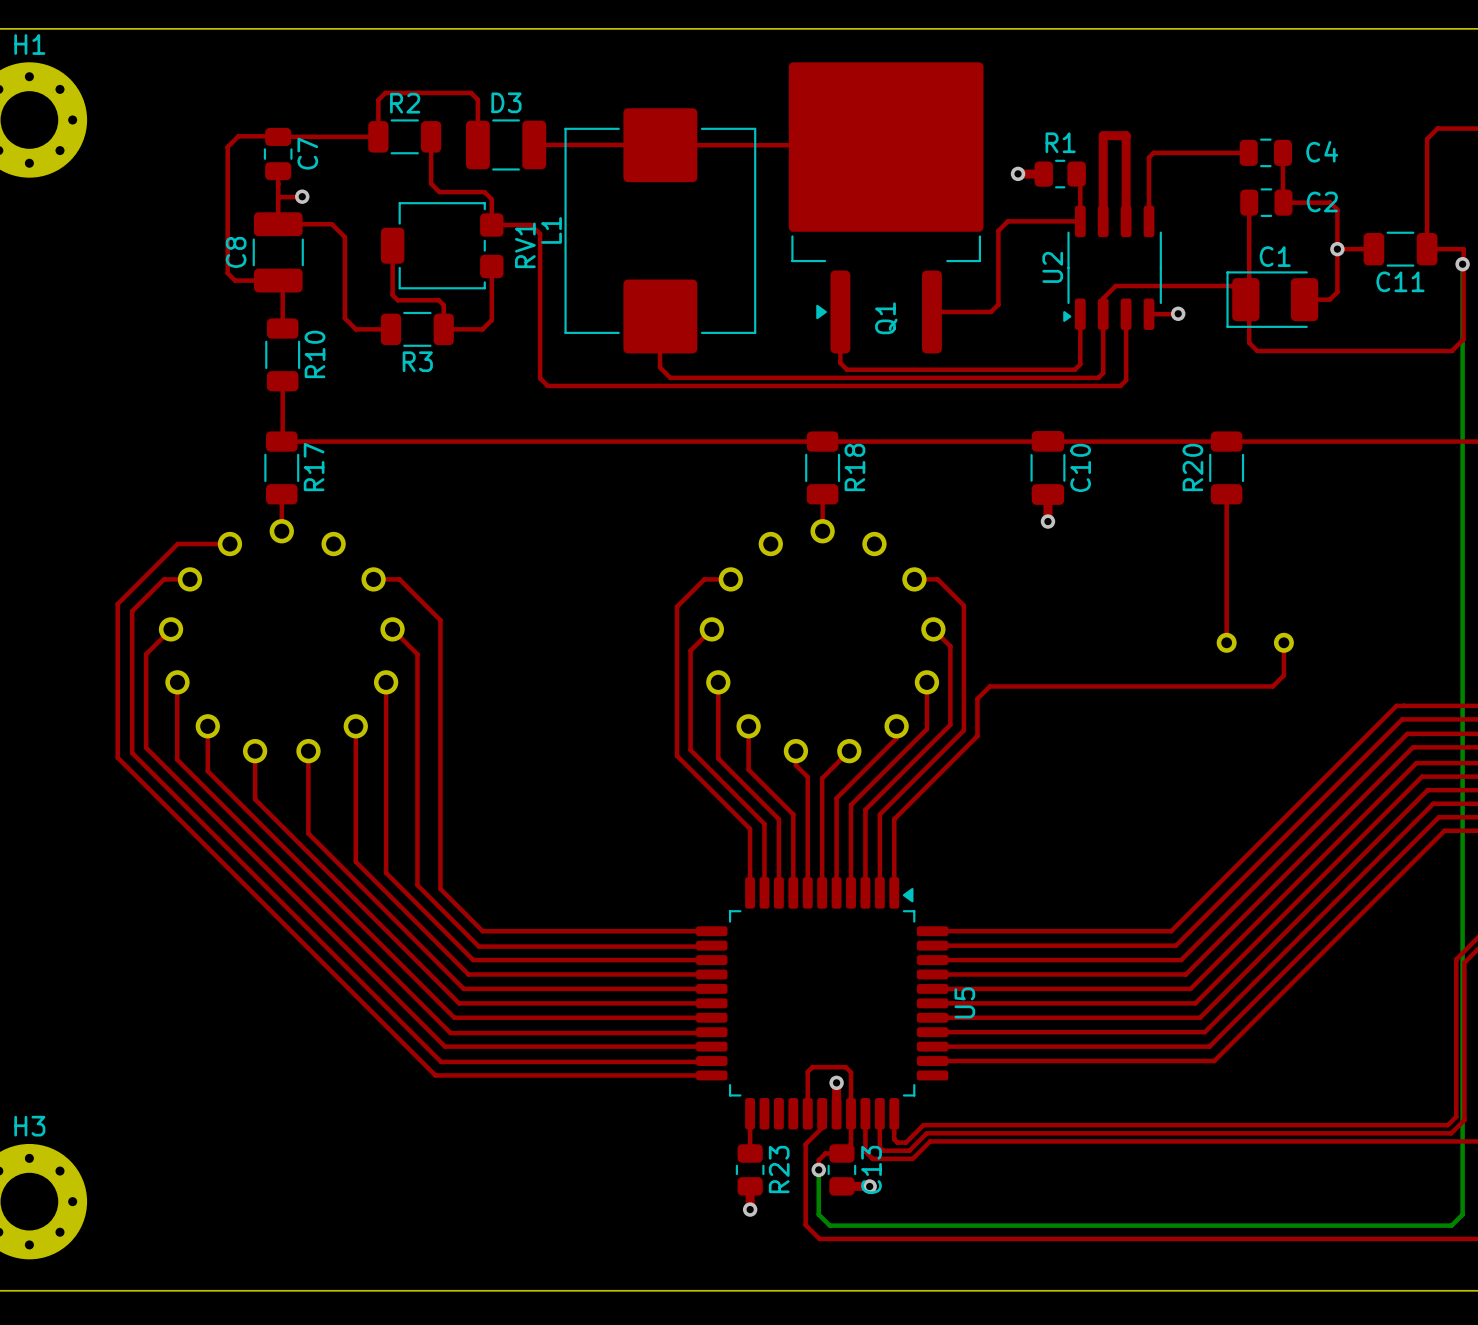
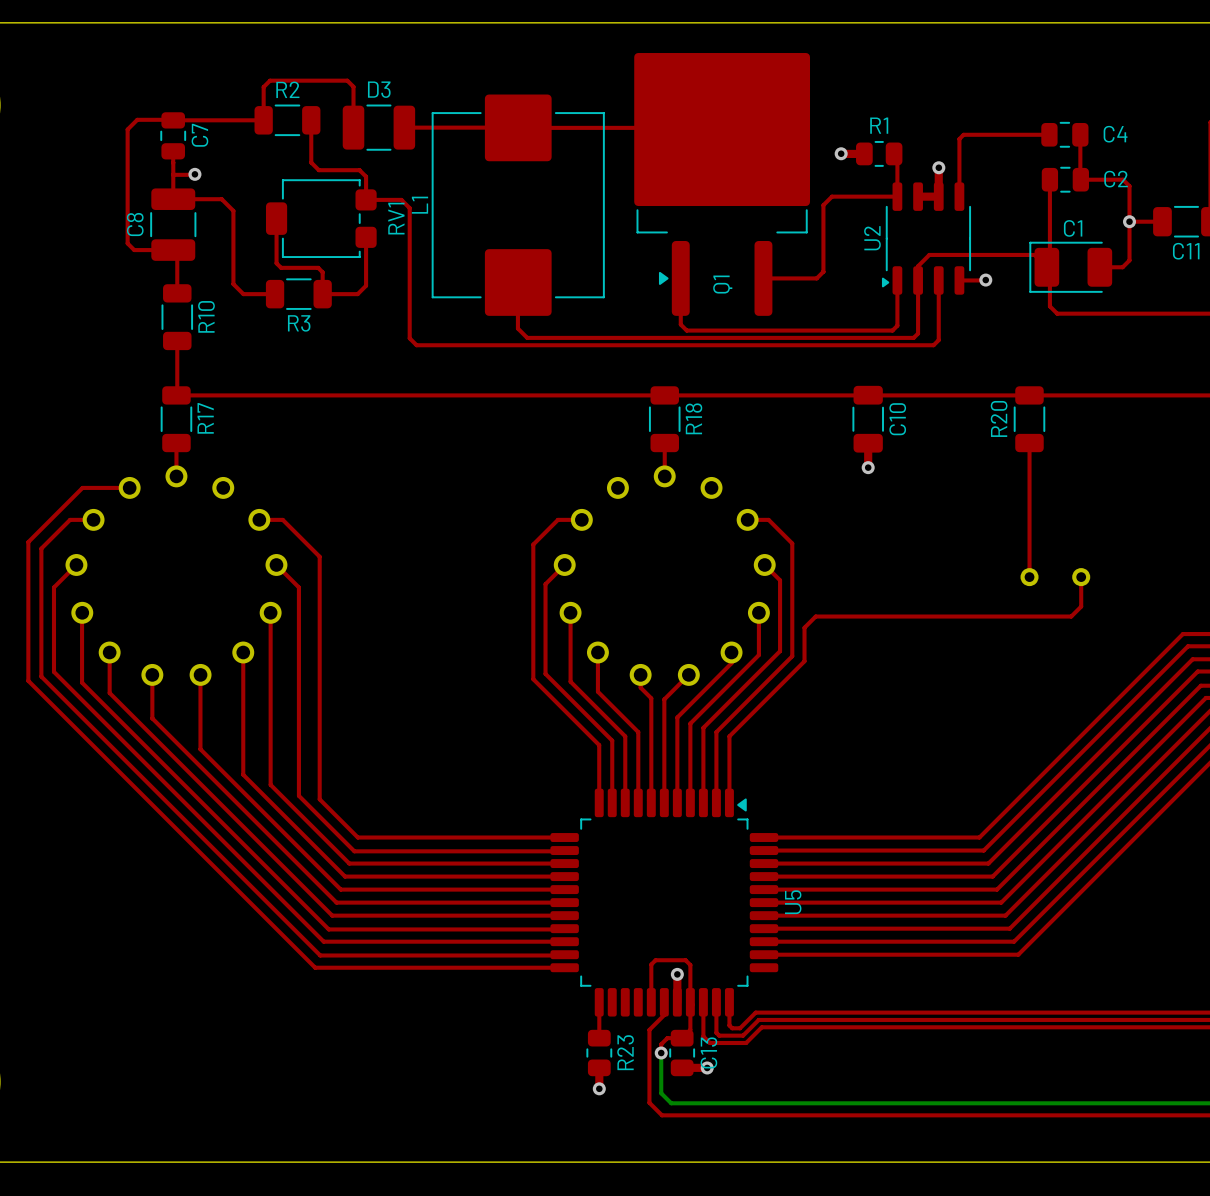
top track: (1125, 135) (1103, 135) (1103, 221) -> (938, 196) (918, 196)
top track: (1126, 135) (1126, 189) -> none
via: none -> (938, 167)

